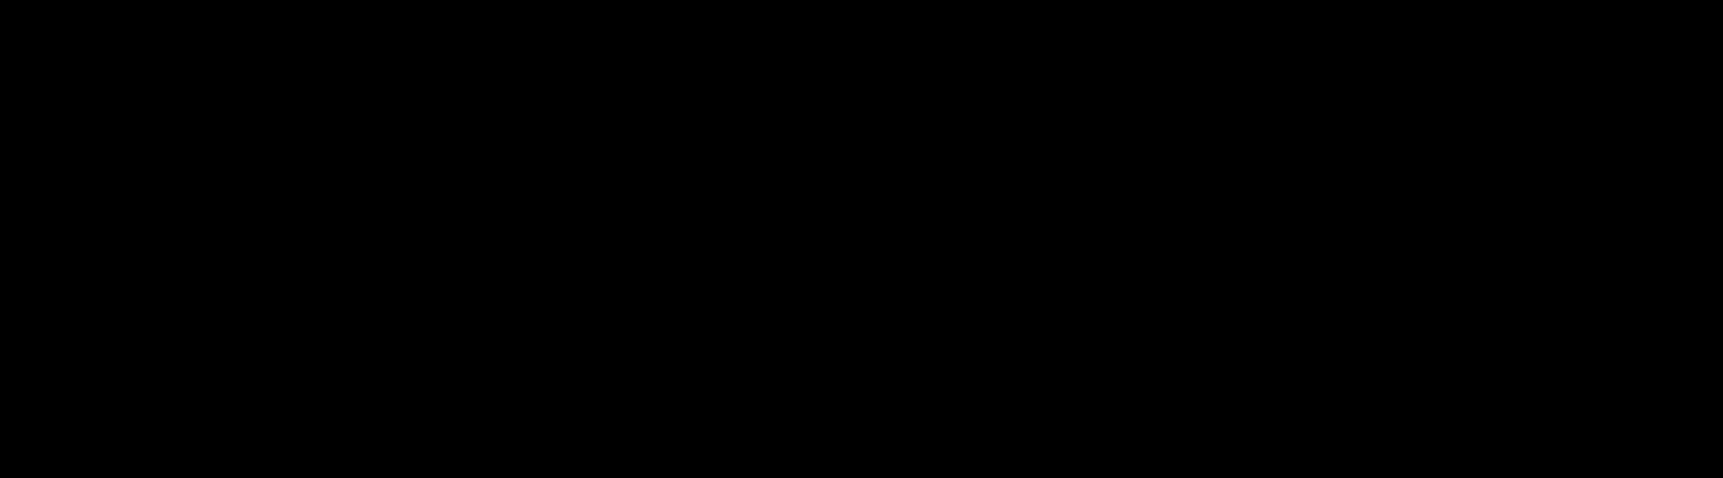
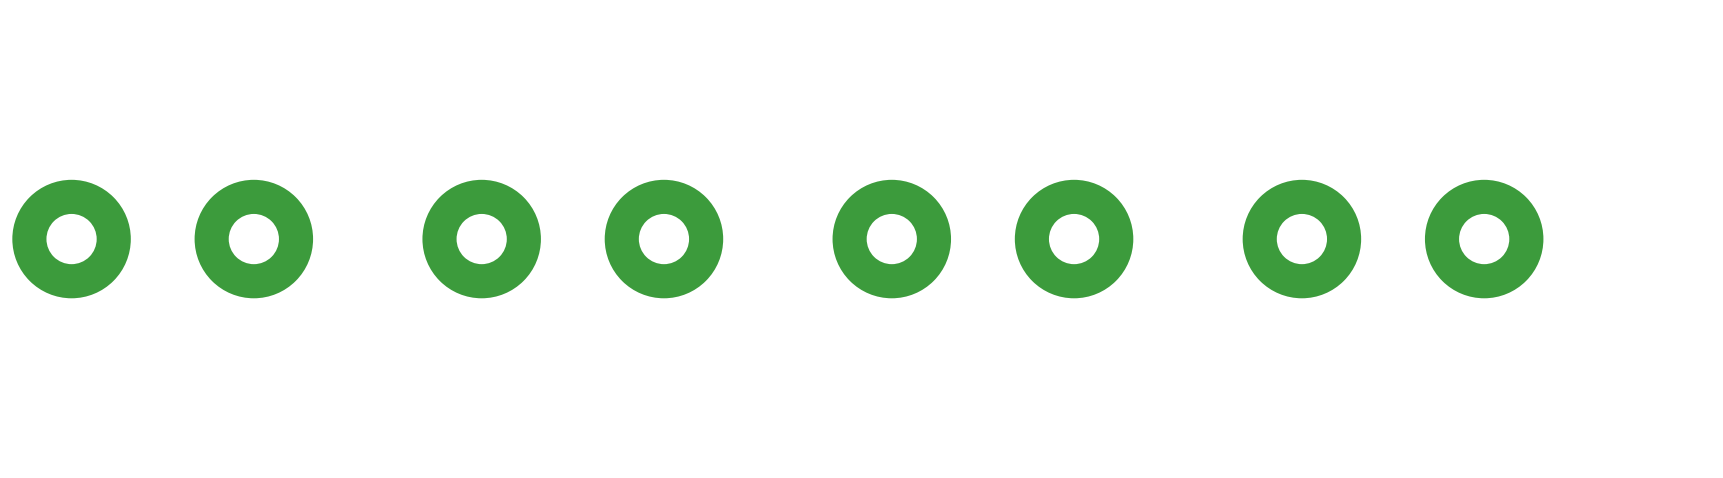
part: none -> (162, 239)
part: none -> (572, 239)
part: none -> (982, 239)
part: none -> (1393, 239)

